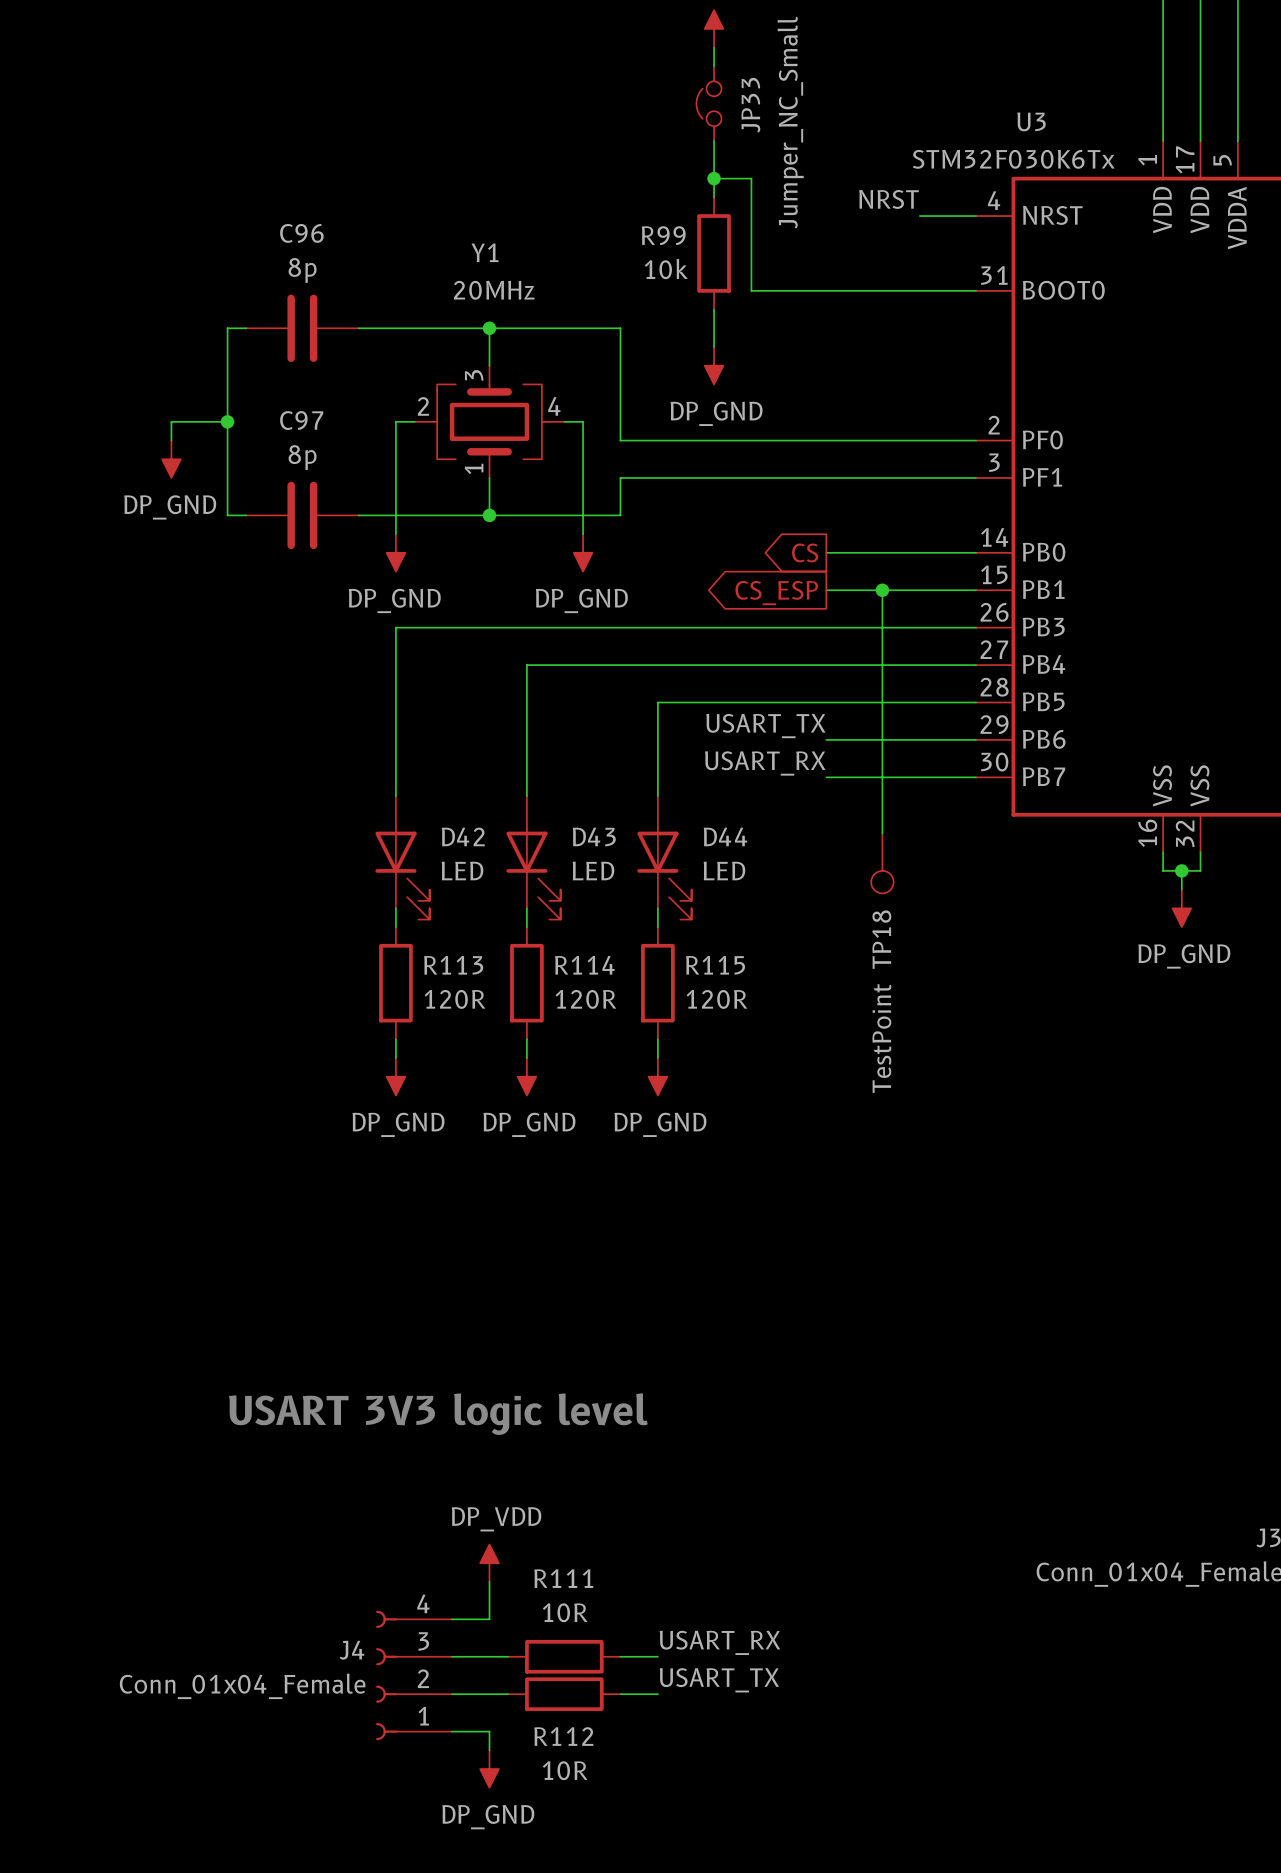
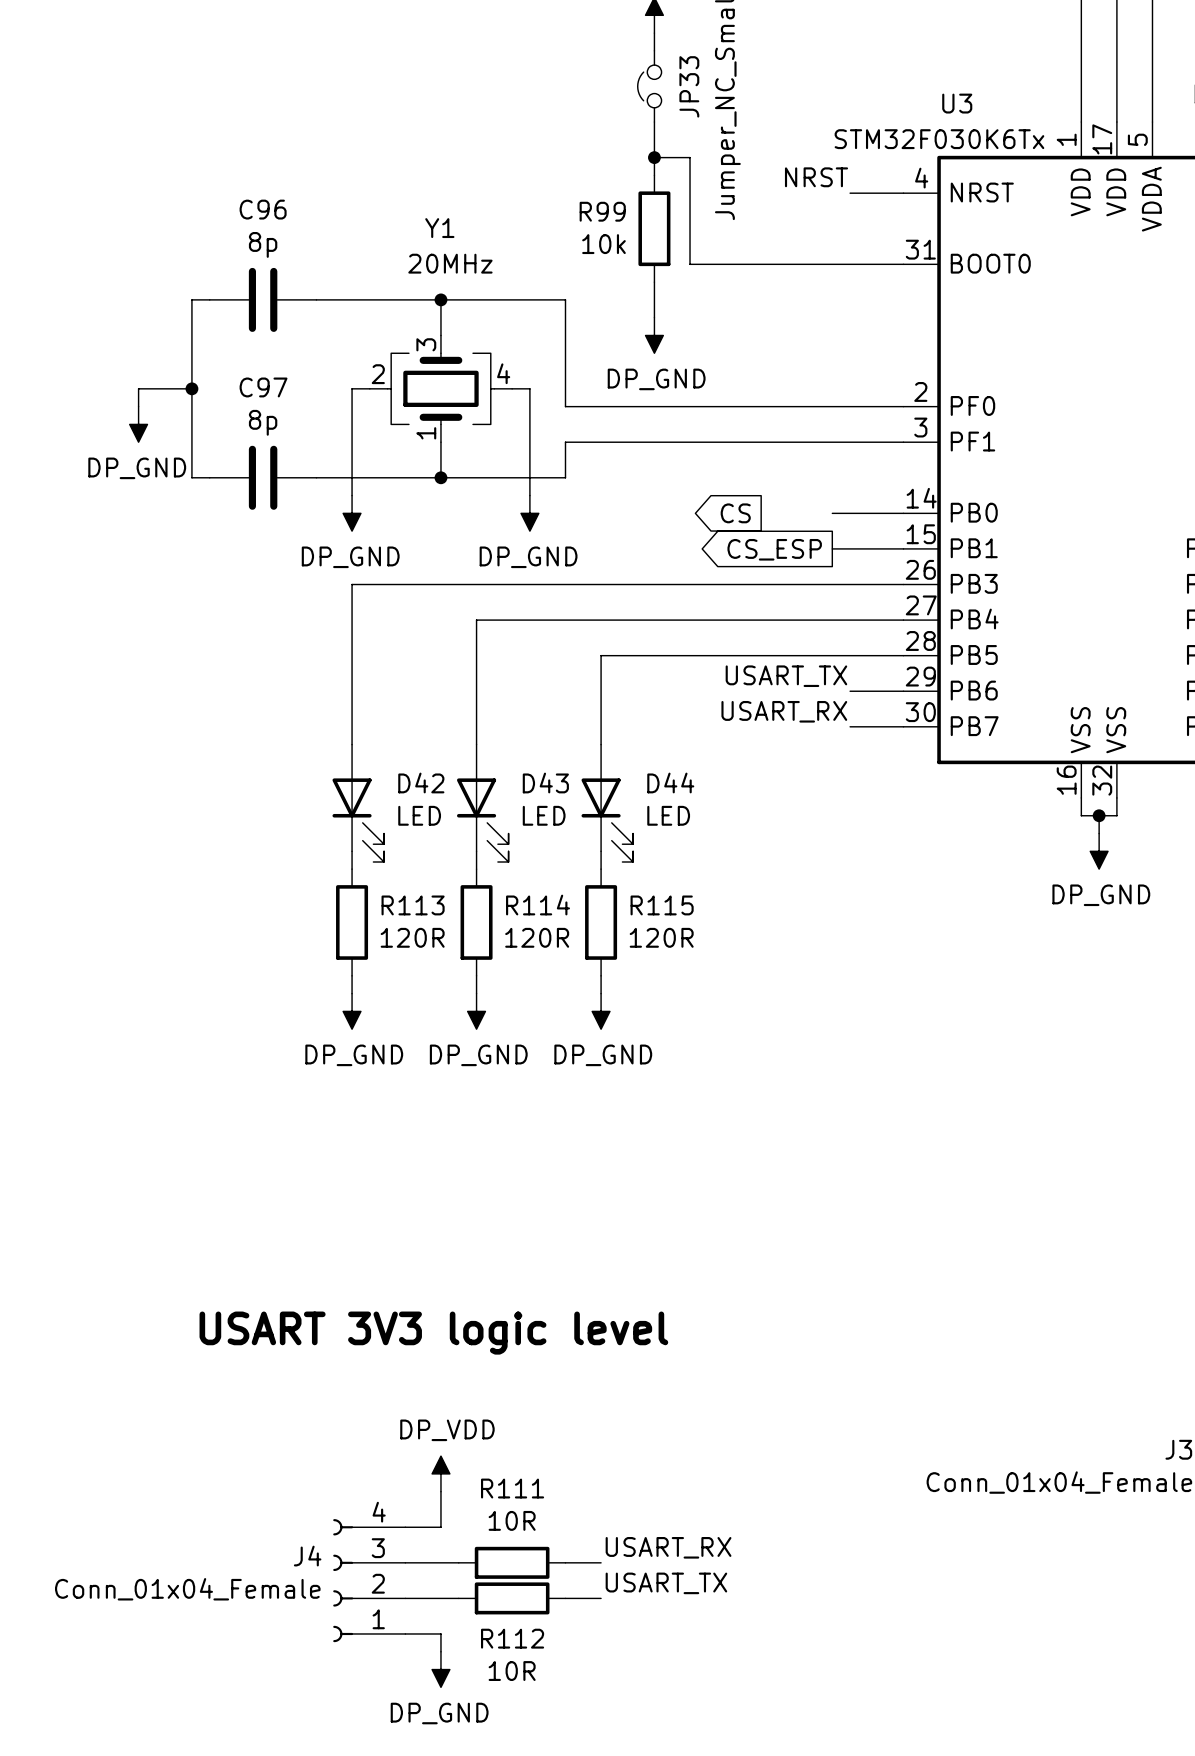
wire: (826, 552) (901, 552) -> none
wire: (826, 590) (901, 590) -> none
wire: (882, 590) (882, 833) -> none
junction: (882, 590) -> none
global label position: CS_ESP (776, 593) -> CS_ESP (774, 549)
label position: USART_TX (765, 726) -> USART_TX (786, 676)
wire: (826, 739) (919, 739) -> none
label position: USART_RX (765, 763) -> USART_RX (784, 711)
wire: (826, 777) (919, 777) -> none
TP18: TestPoint (882, 863) -> none

